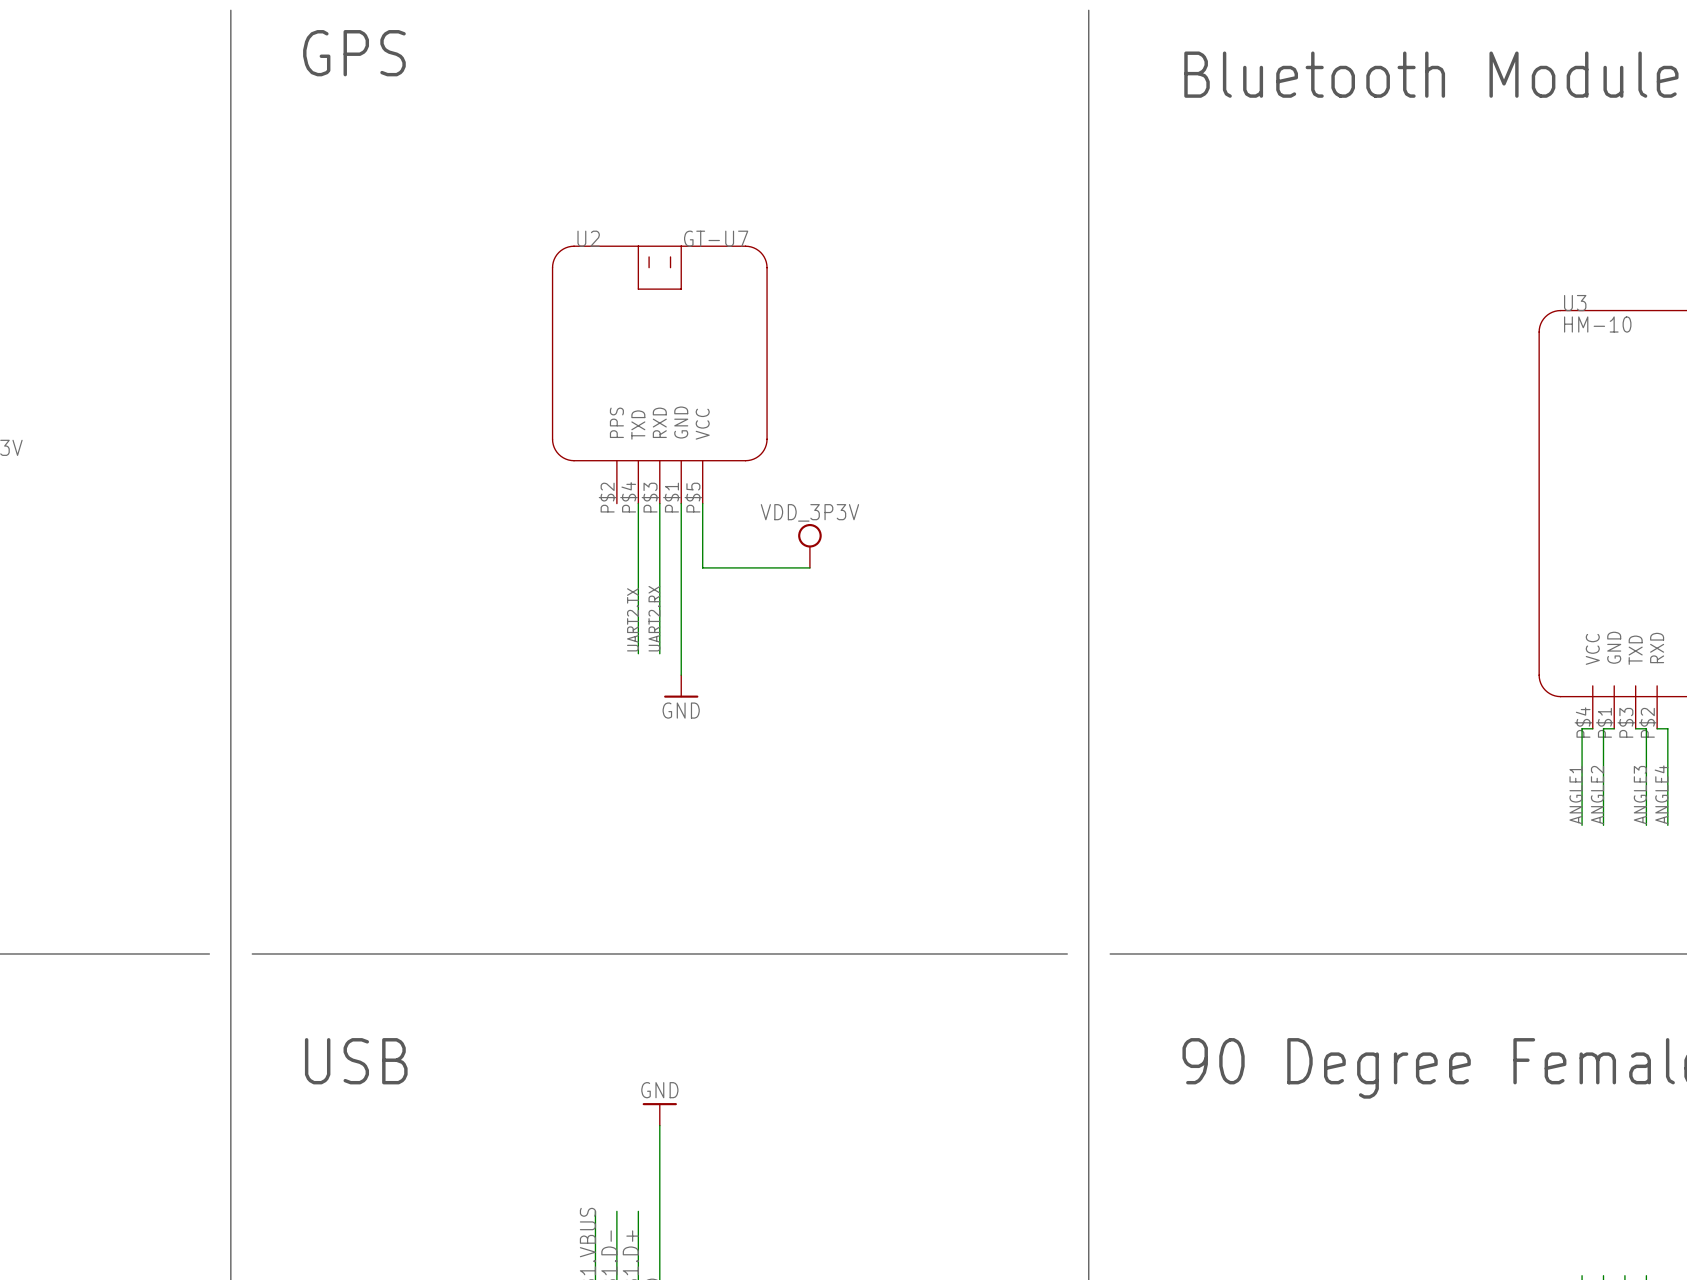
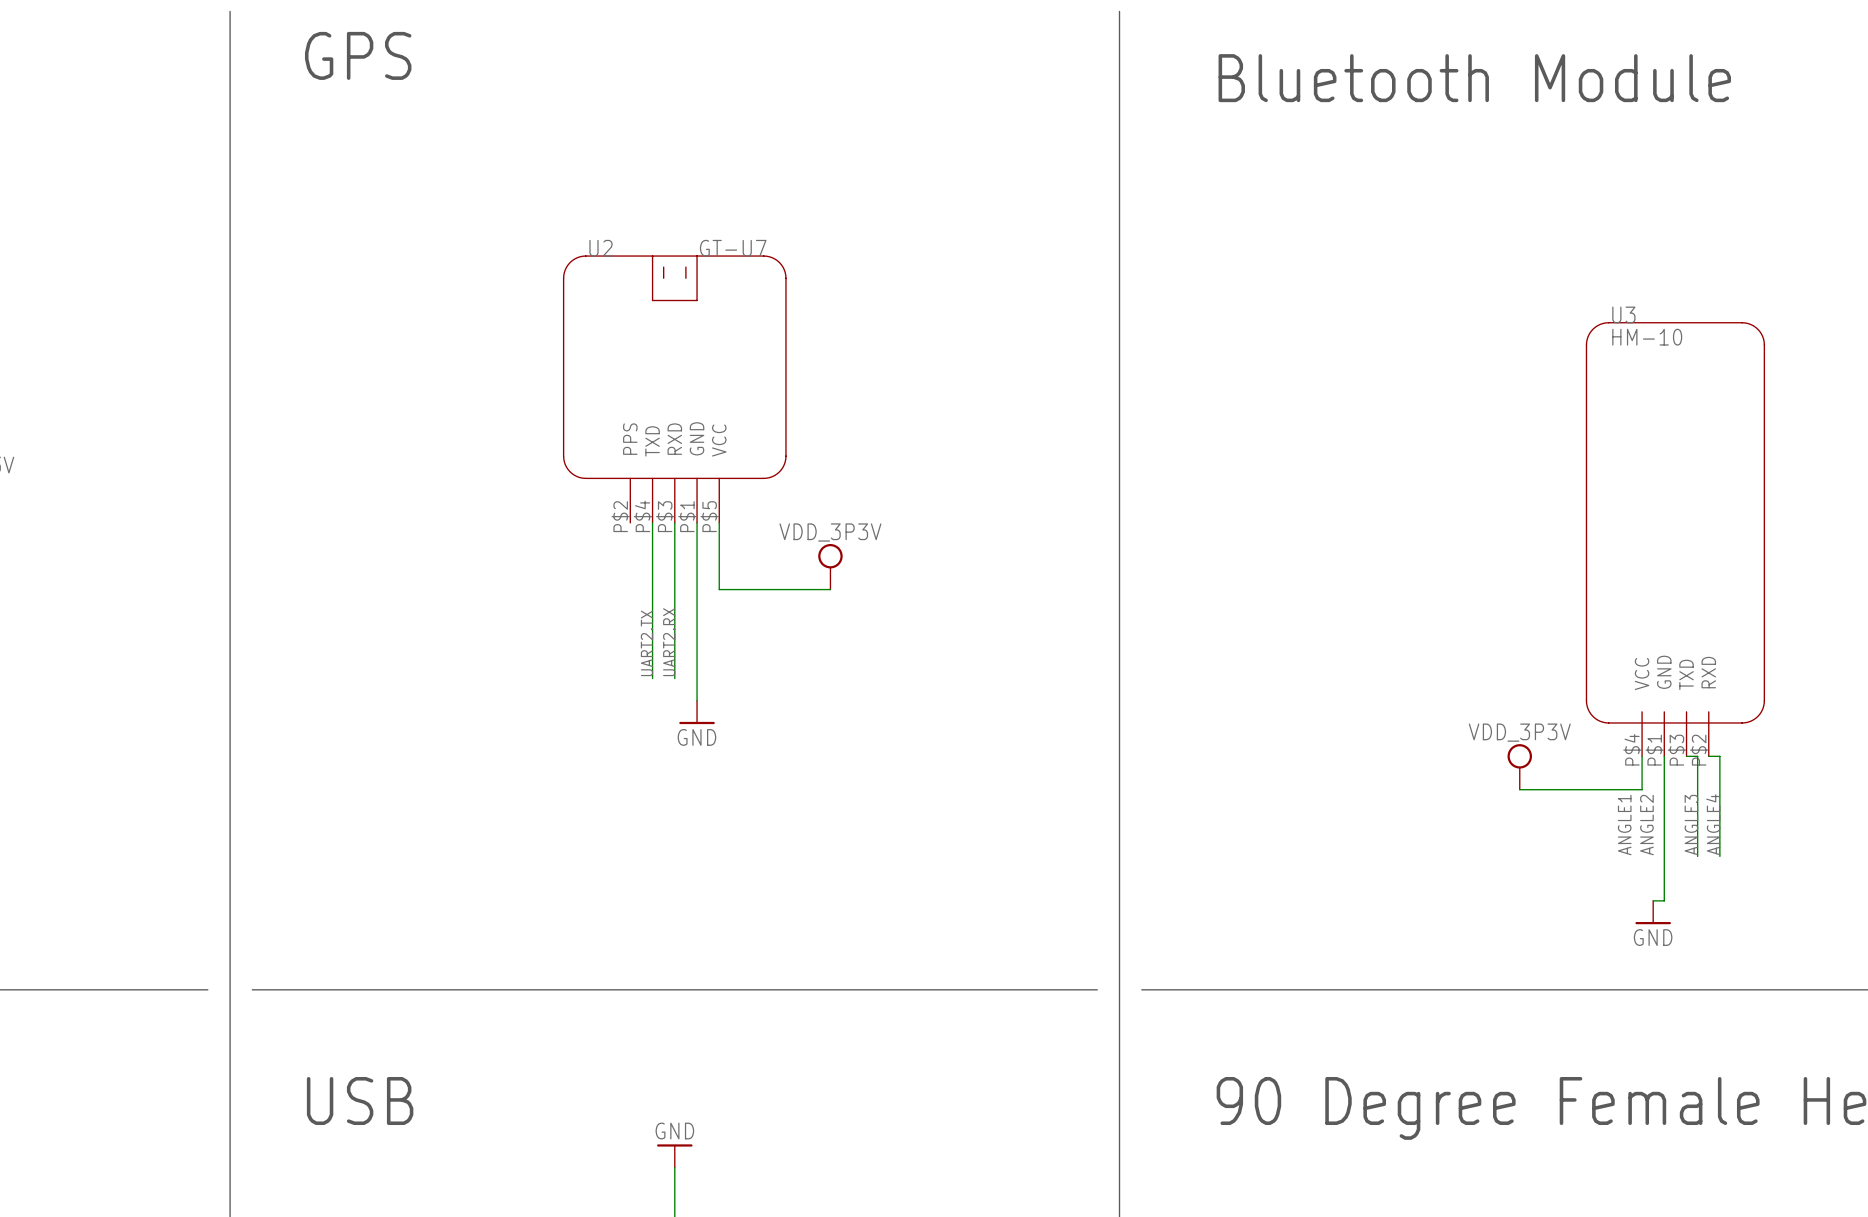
wire: (1592, 728) (1582, 728) (1582, 825) -> (1642, 756) (1642, 789) (1519, 789)
wire: (1614, 728) (1603, 728) (1603, 825) -> (1664, 756) (1664, 900) (1653, 900)
power symbol: none -> VDD_3P3V (1519, 766)
power symbol: none -> GND (1653, 912)

